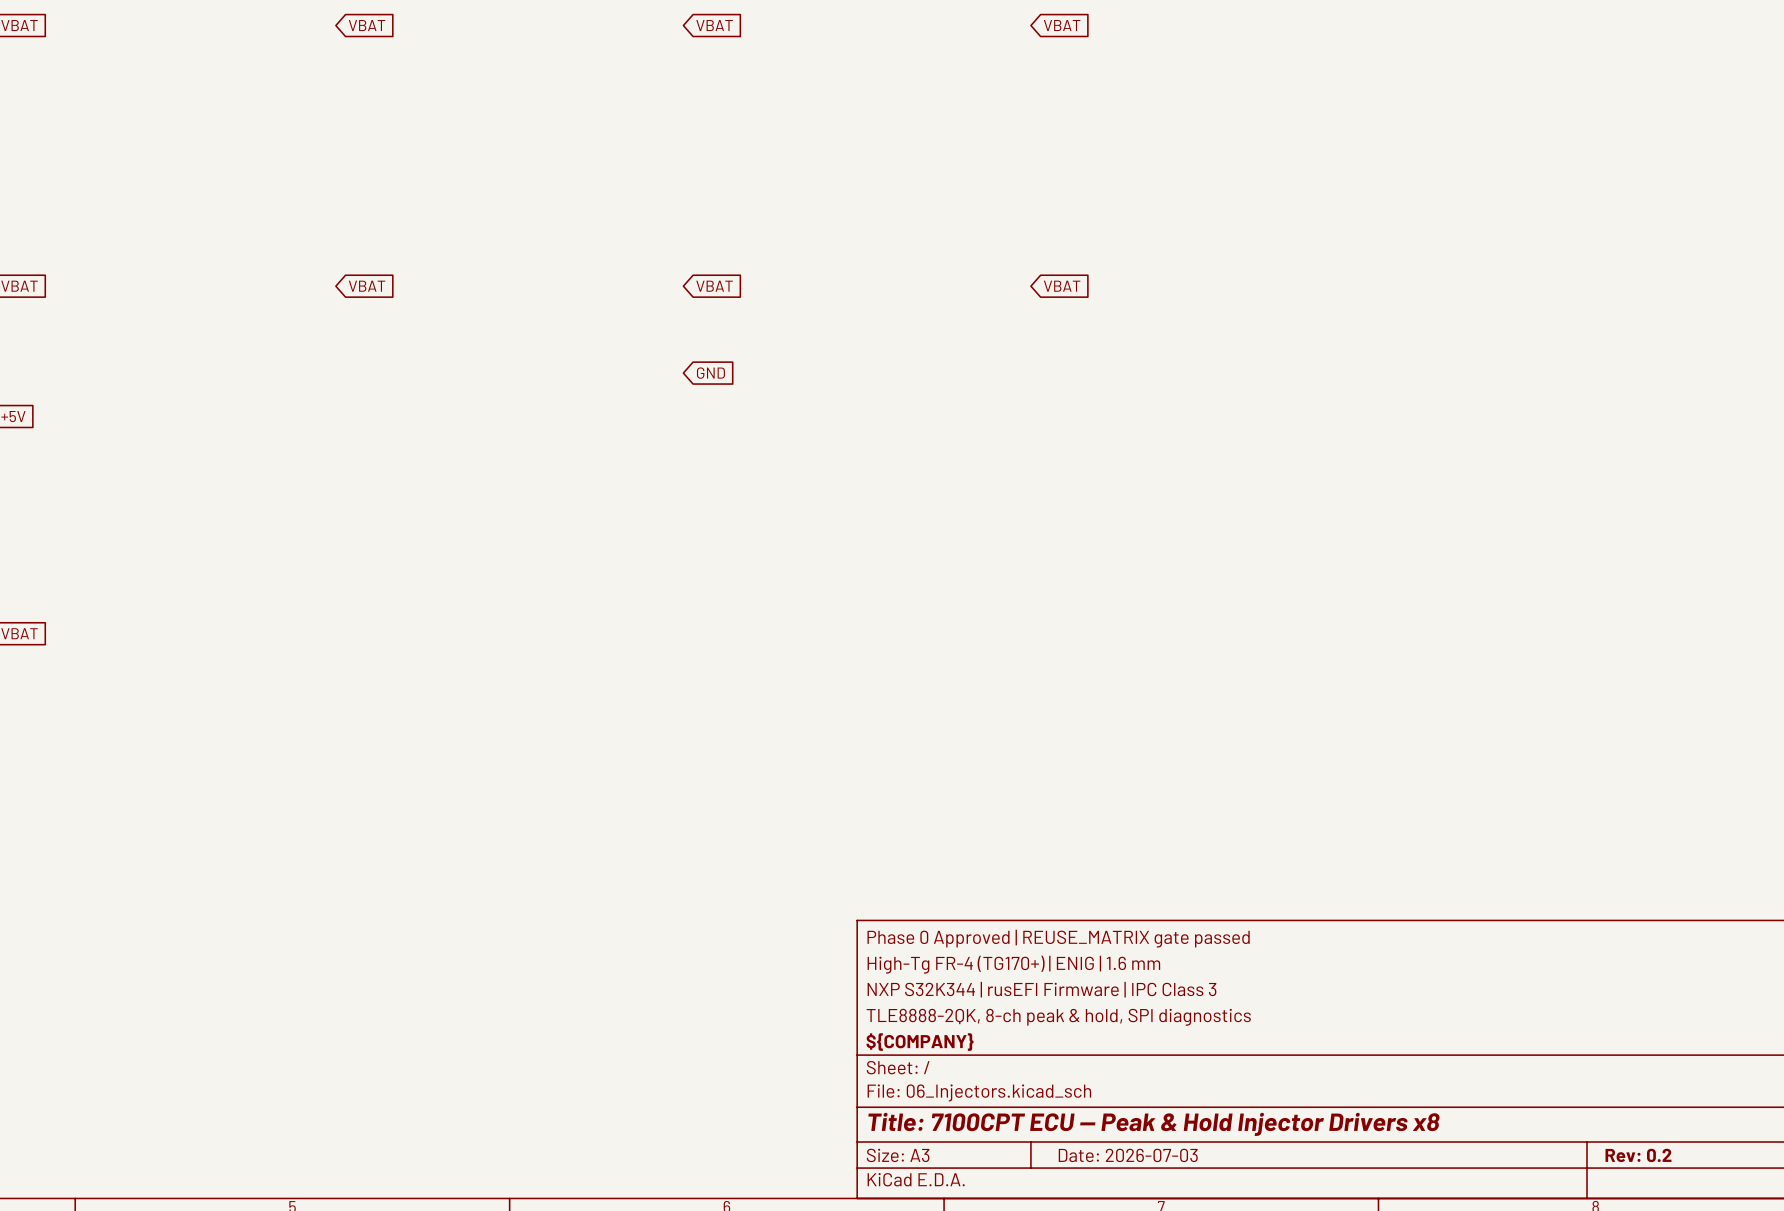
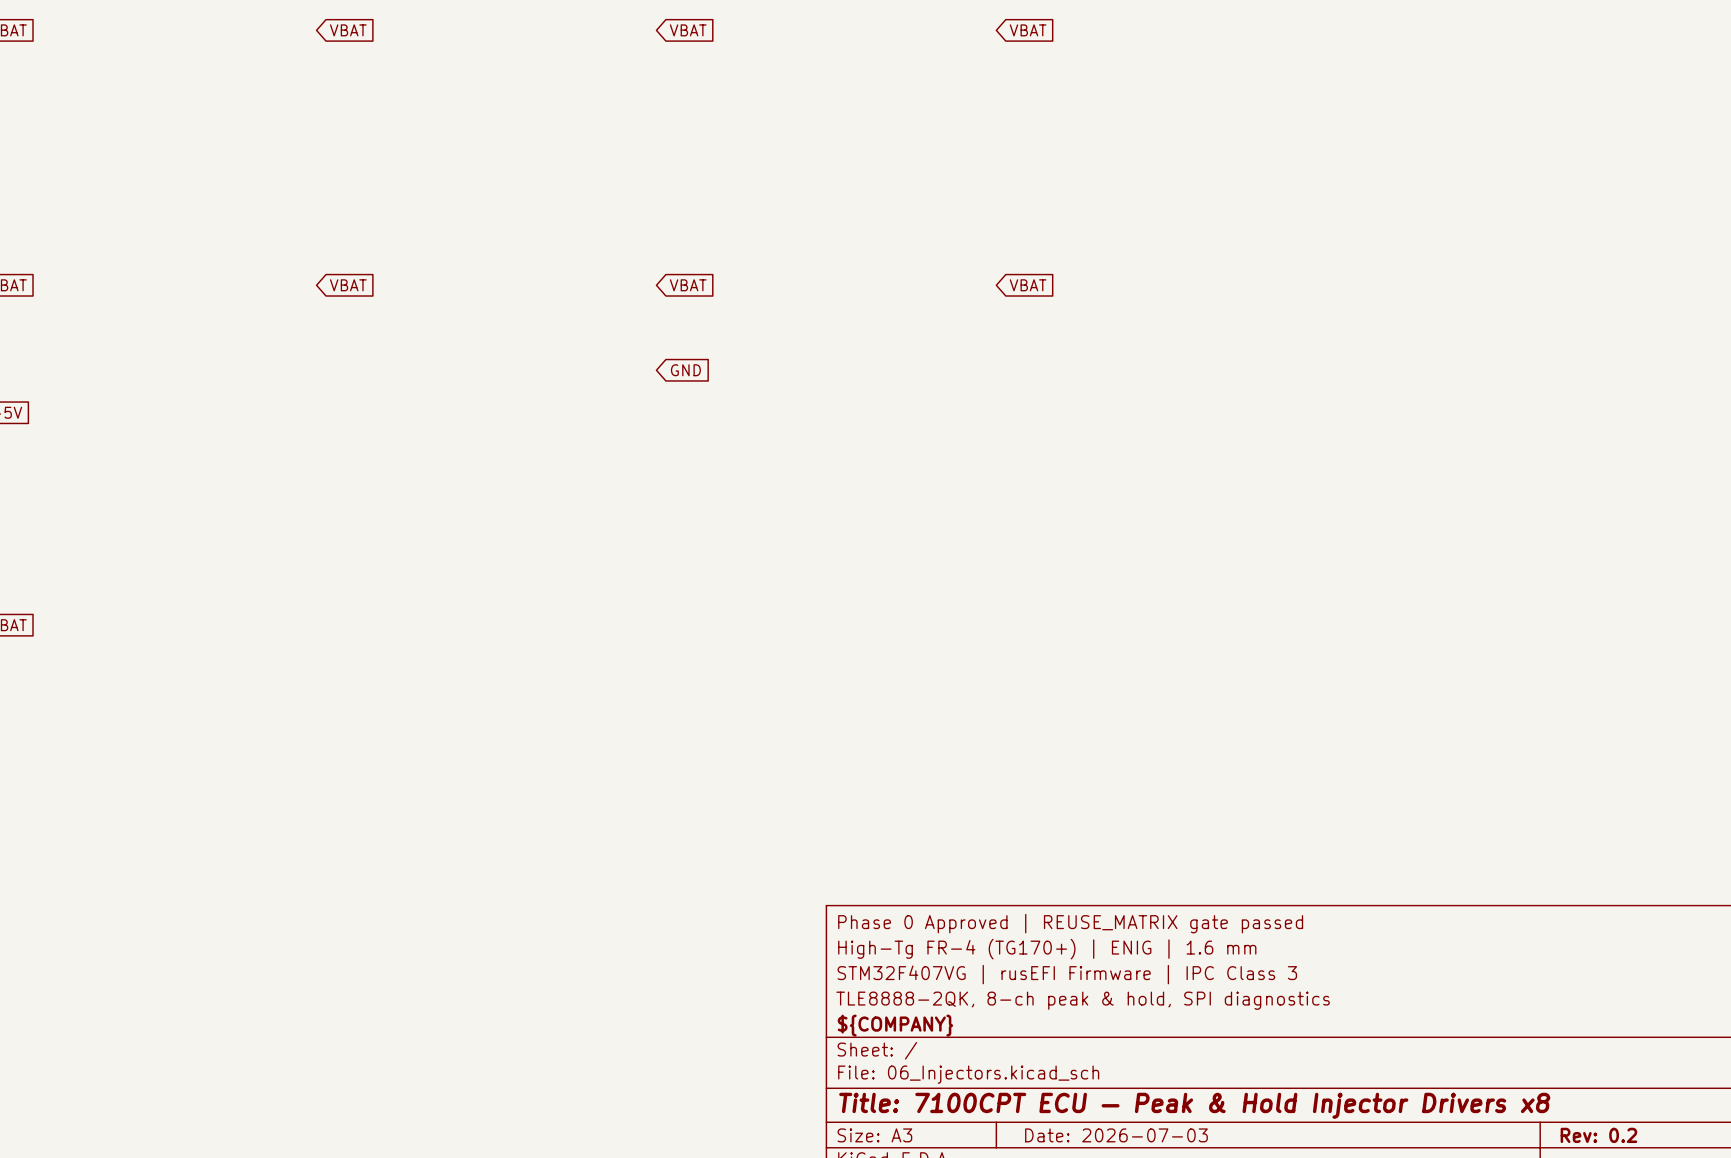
title block: NXP S32K344 | rusEFI Firmware | IPC Class 3 (1041, 989) -> STM32F407VG | rusEFI Firmware | IPC Class 3 (1067, 974)

